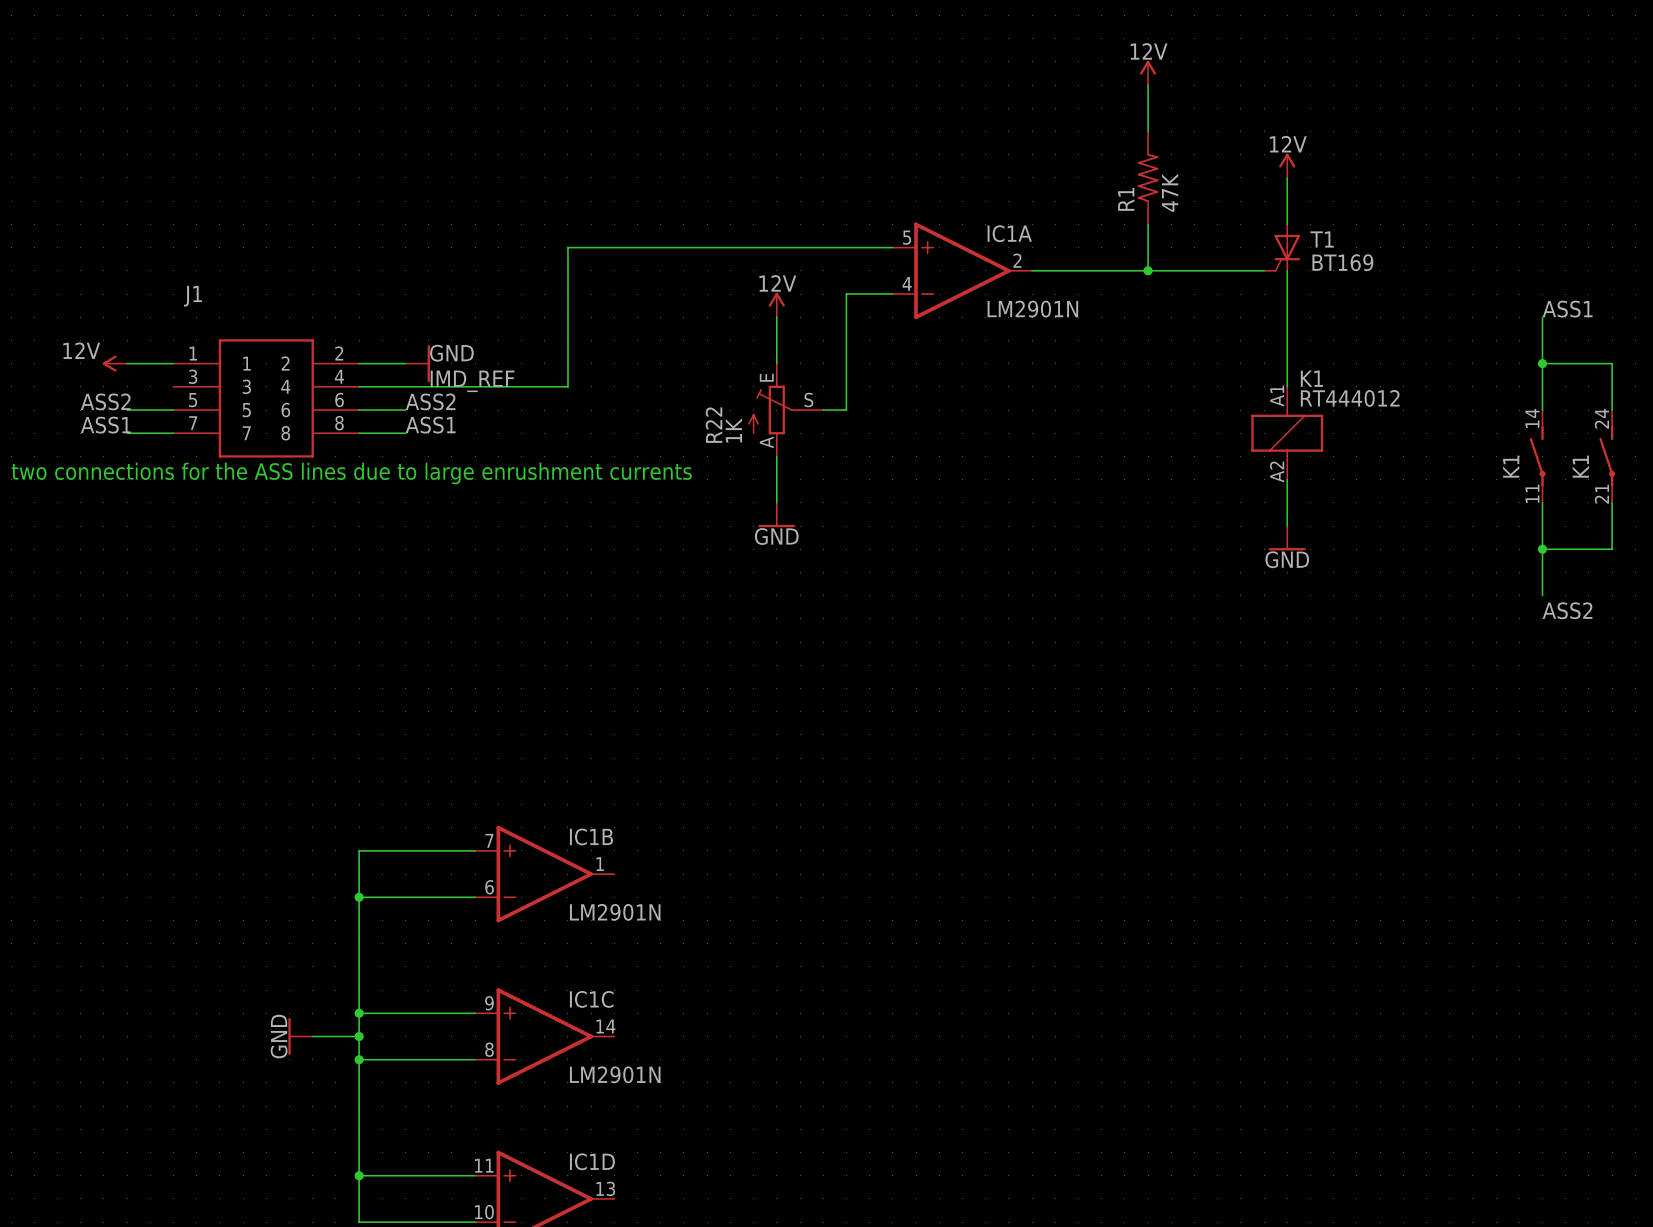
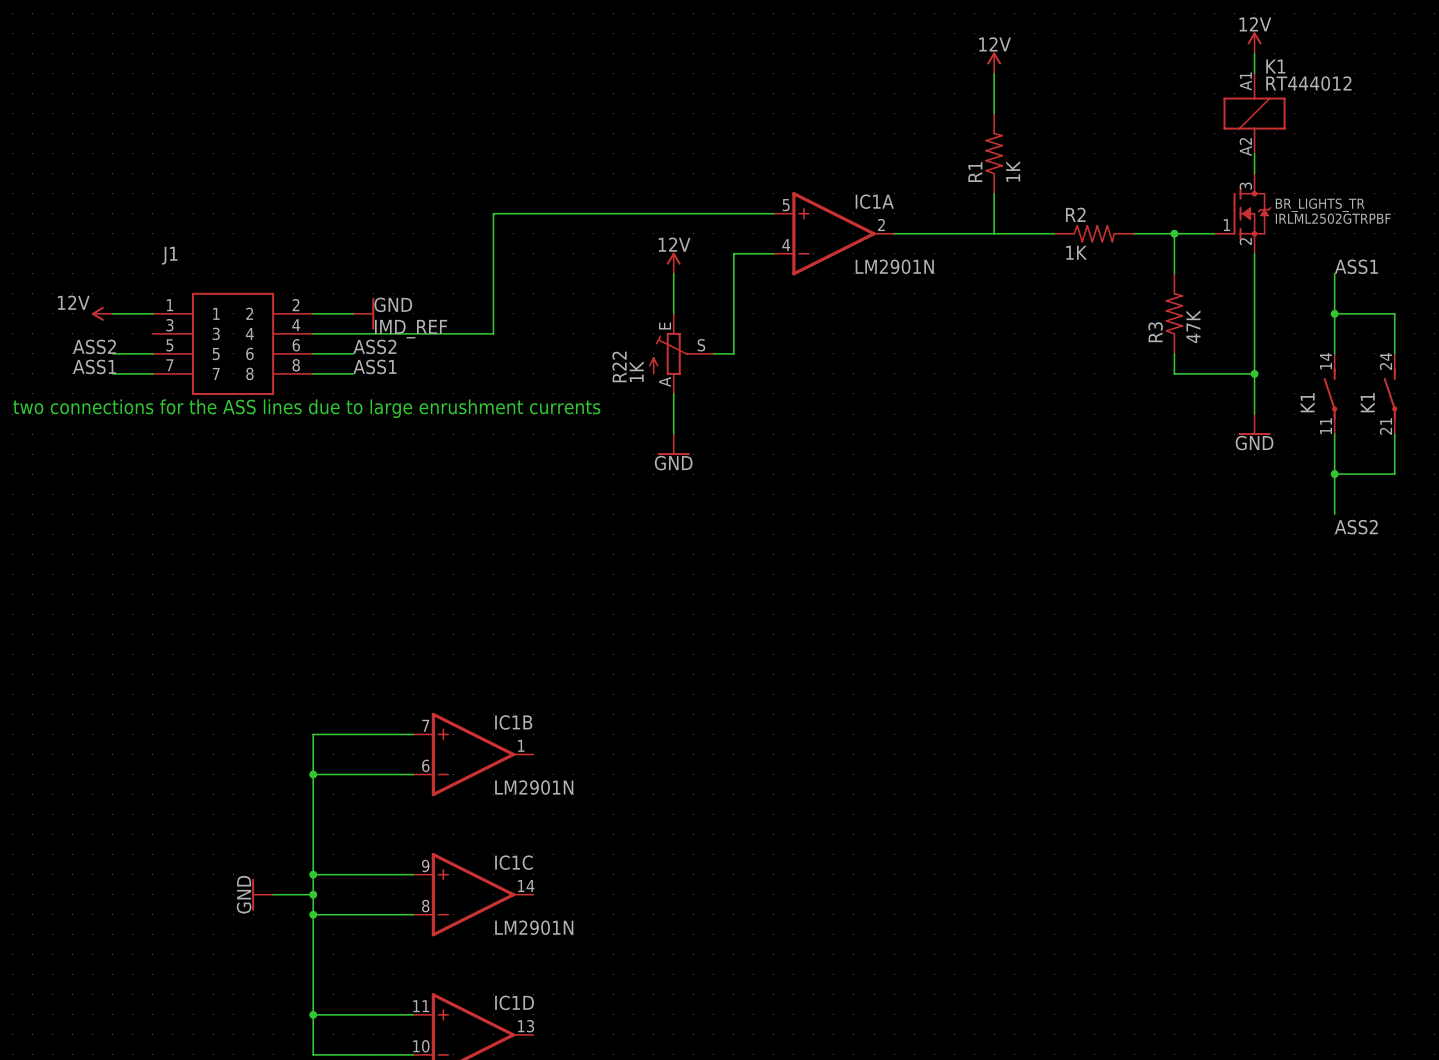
wire: none -> (1254, 53) (1254, 73)
K1: none -> RT444012 (1254, 113)
power symbol position: 12V (1287, 165) -> 12V (1254, 42)
wire: (1287, 177) (1287, 224) -> (1174, 233) (1174, 273)
wire: none -> (1254, 153) (1254, 173)
R1 value: 47K (1170, 192) -> 1K (1013, 171)
T1: BT169 (1281, 247) -> none
BR_LIGHTS_TR: none -> IRLML2502GTRPBF (1242, 213)
junction: (1148, 270) -> none
R2: none -> 1K (1094, 233)
wire: (1287, 270) (1287, 386) -> none
wire: none -> (1134, 233) (1214, 233)
junction: none -> (1174, 233)
wire: none -> (1254, 253) (1254, 414)
R3: none -> 47K (1174, 313)
wire: none -> (1174, 353) (1174, 373) (1254, 373)
K1: RT444012 (1287, 433) -> none
junction: none -> (1254, 373)
wire: (1287, 479) (1287, 526) -> none
power symbol position: GND (1287, 538) -> GND (1254, 424)

